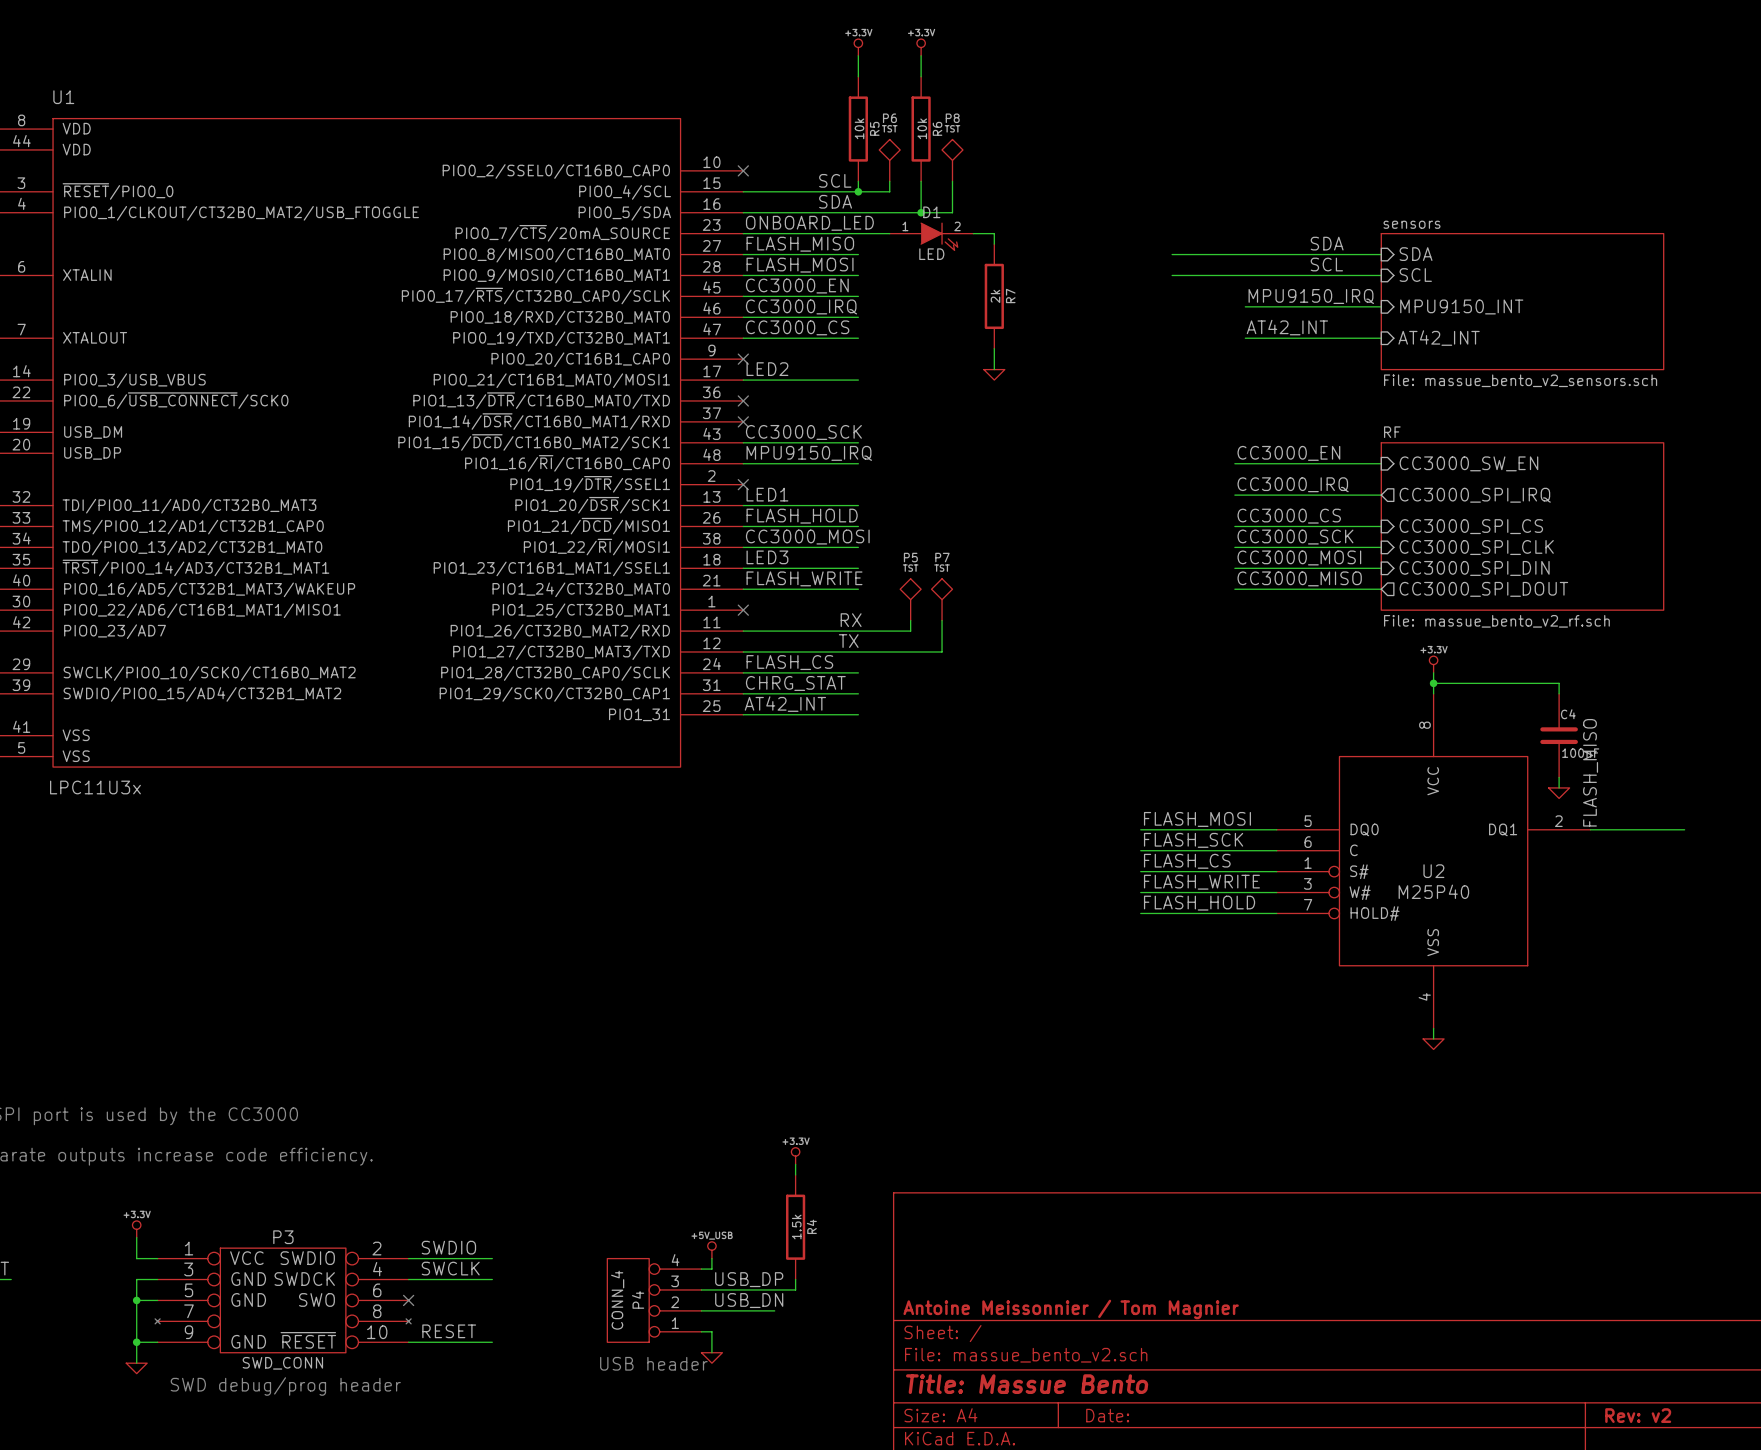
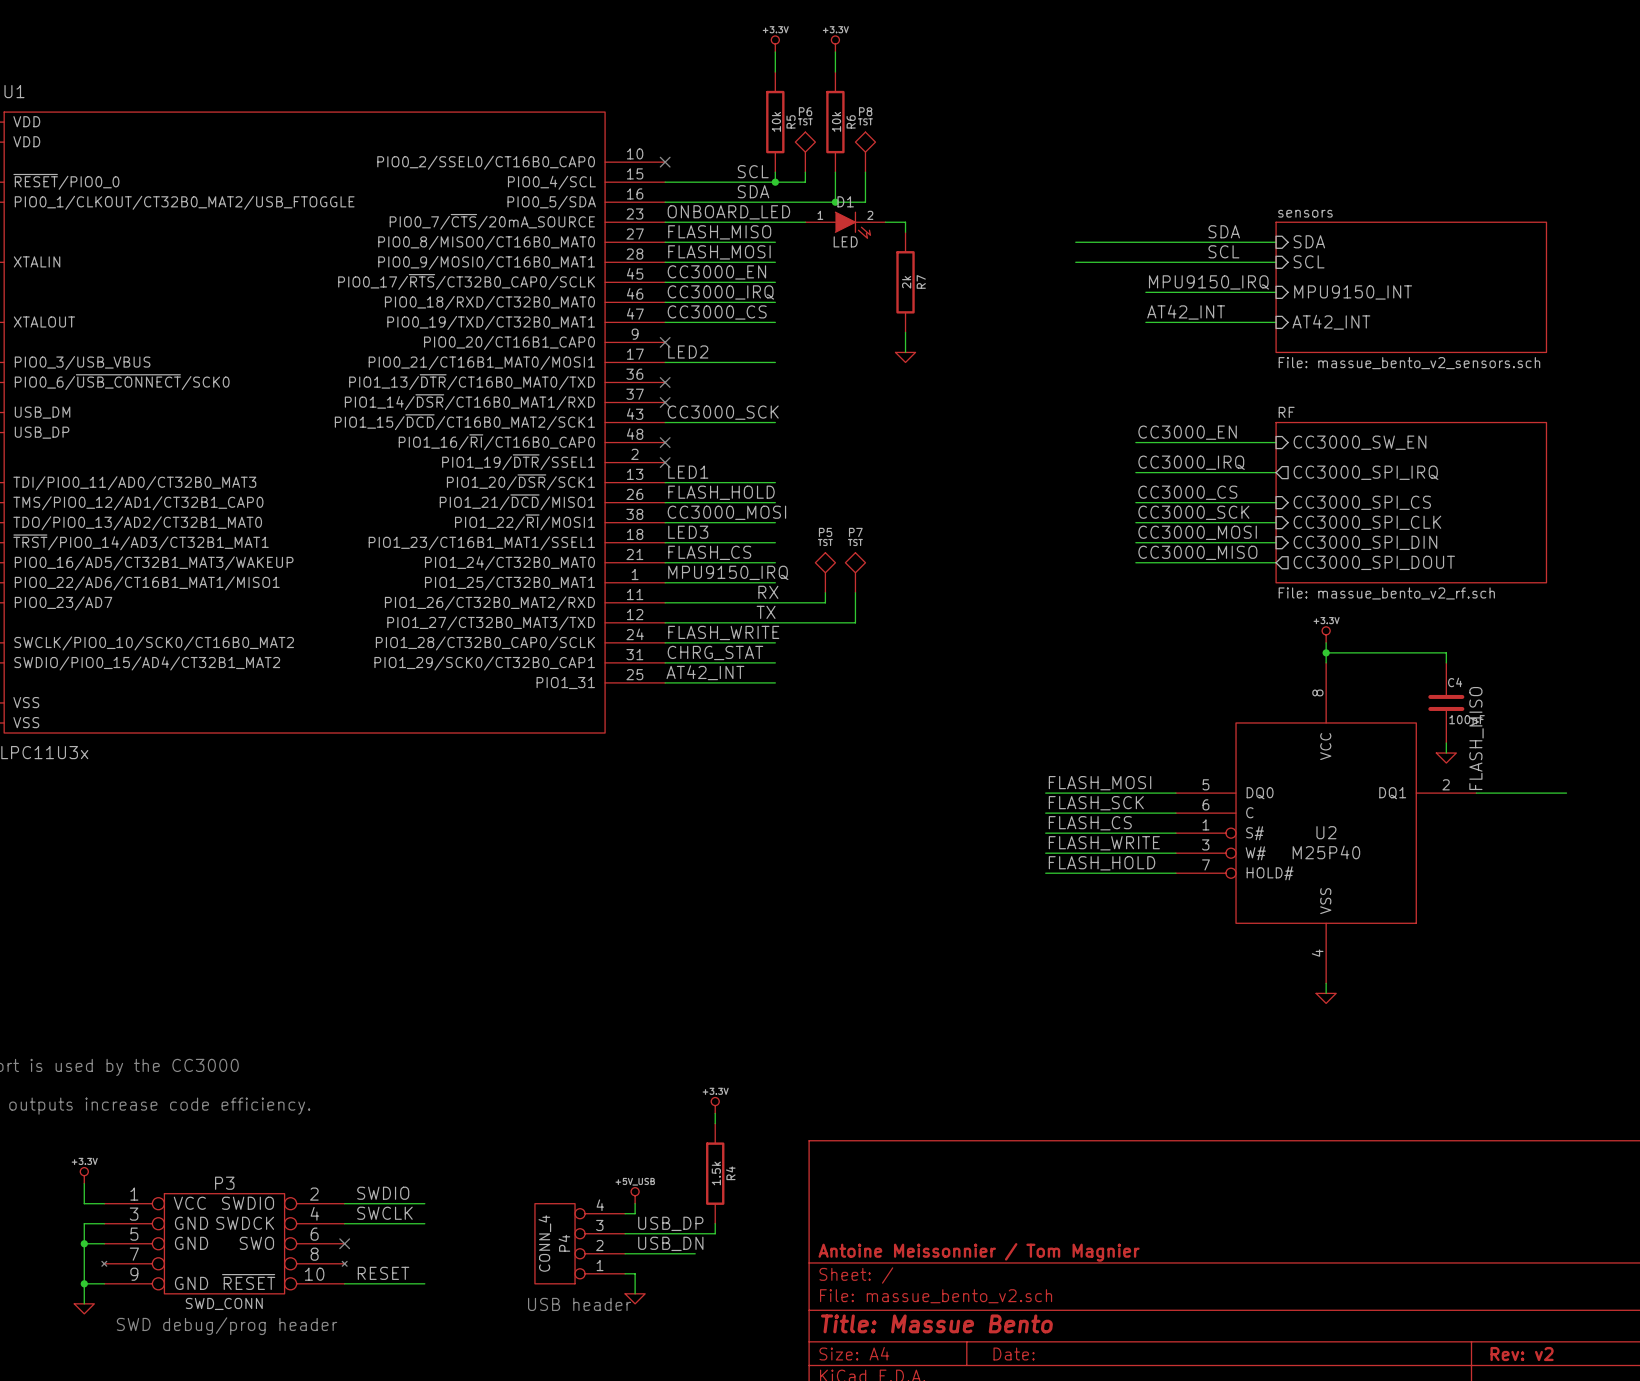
label position: MPU9150_IRQ (809, 453) -> MPU9150_IRQ (728, 572)
wire: (743, 463) (858, 463) -> (665, 582) (775, 582)
no-connect mark: none -> (665, 442)
label: FLASH_WRITE (804, 578) -> FLASH_CS (709, 552)
no-connect mark: (743, 610) -> none
label: FLASH_CS (789, 662) -> FLASH_WRITE (723, 632)

